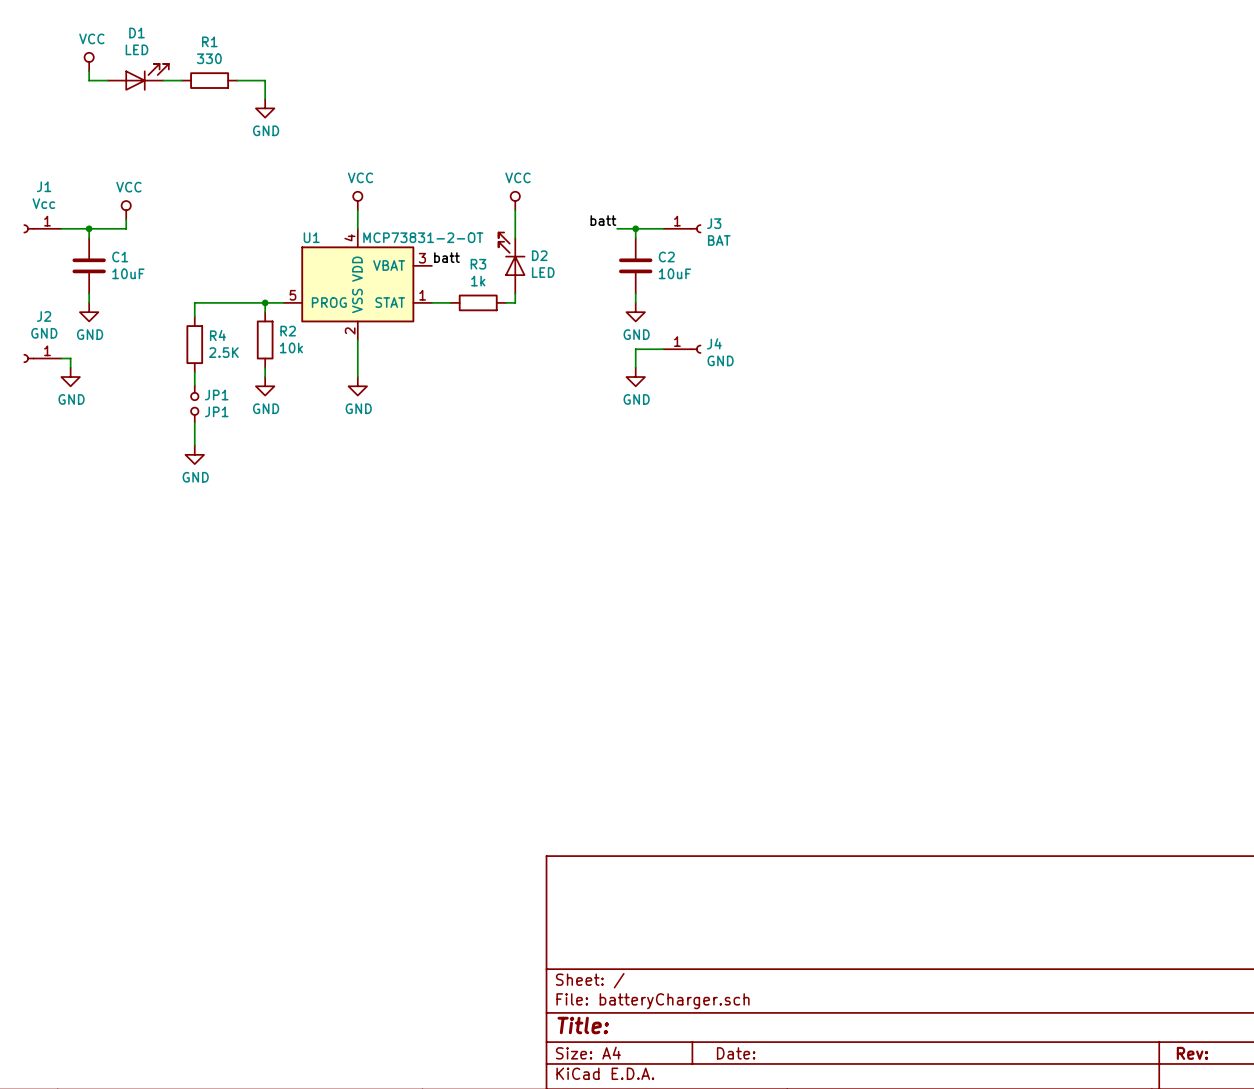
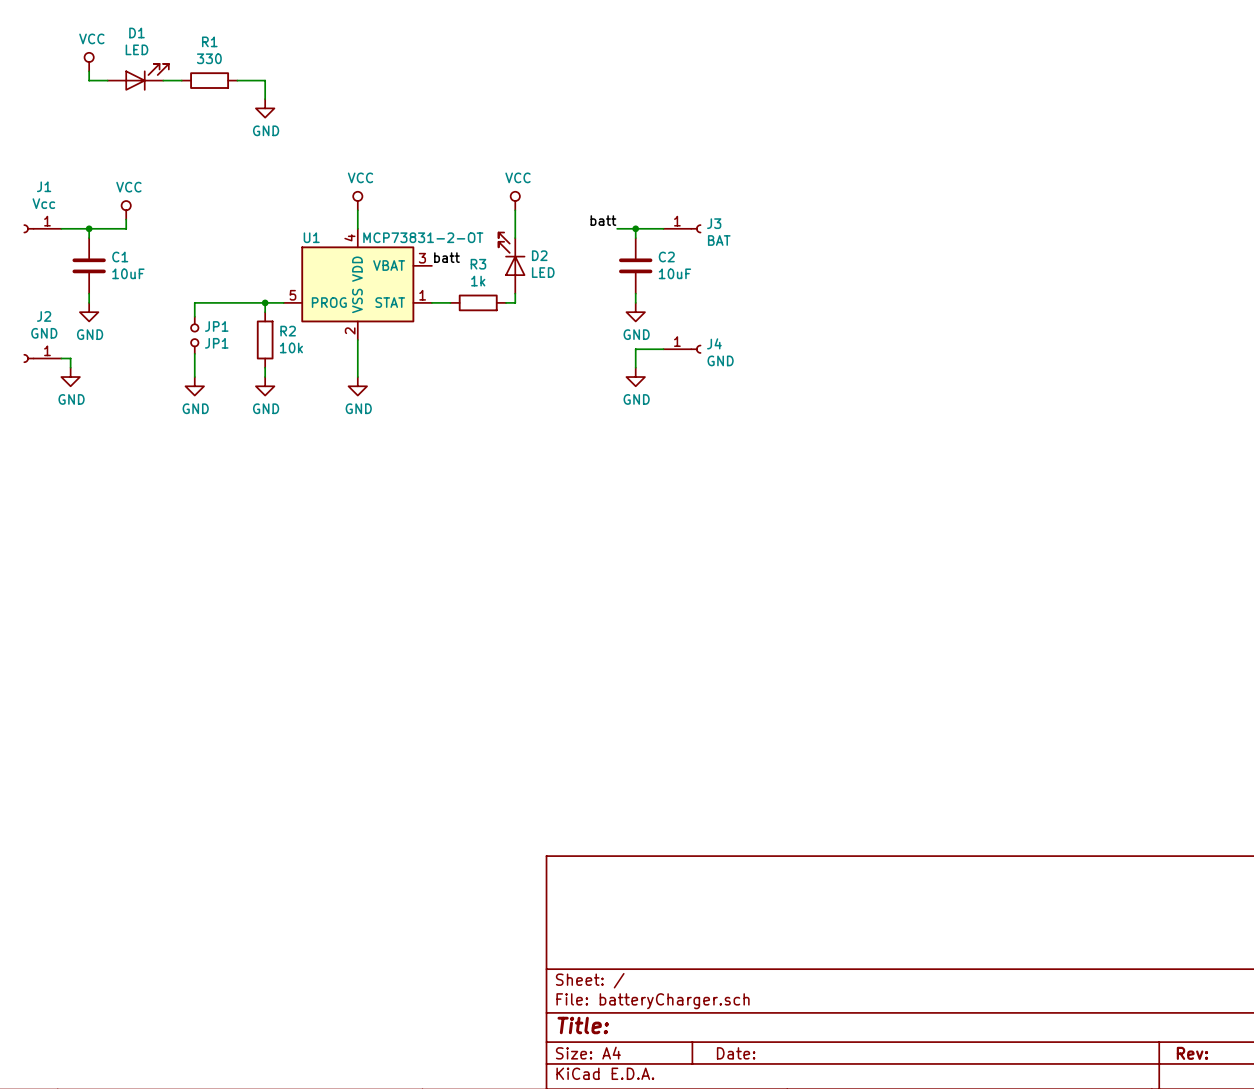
R4: 2.5K (194, 344) -> none
JP1 position: (194, 403) -> (194, 335)
wire: (194, 422) (194, 445) -> none
power symbol position: GND (194, 454) -> GND (194, 386)

